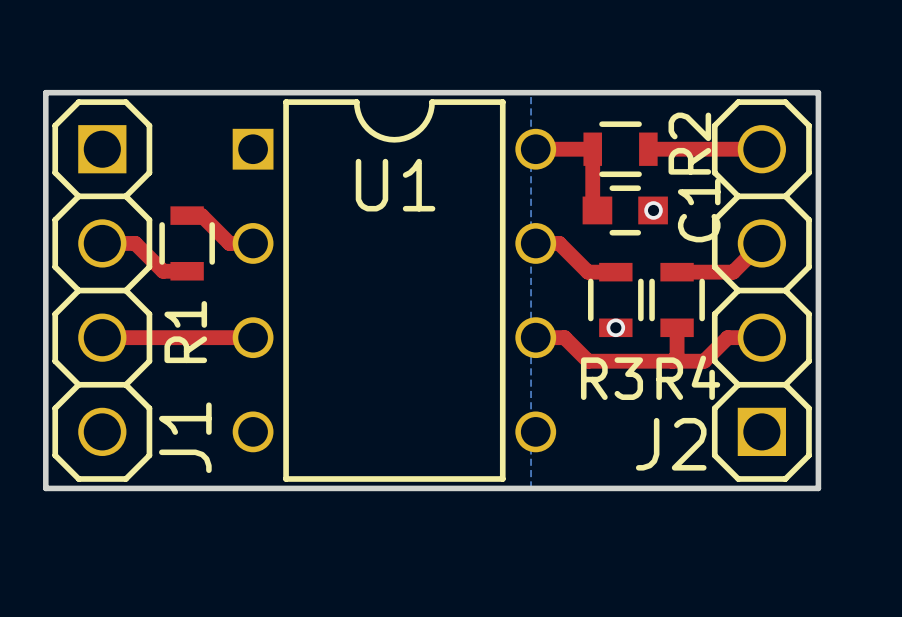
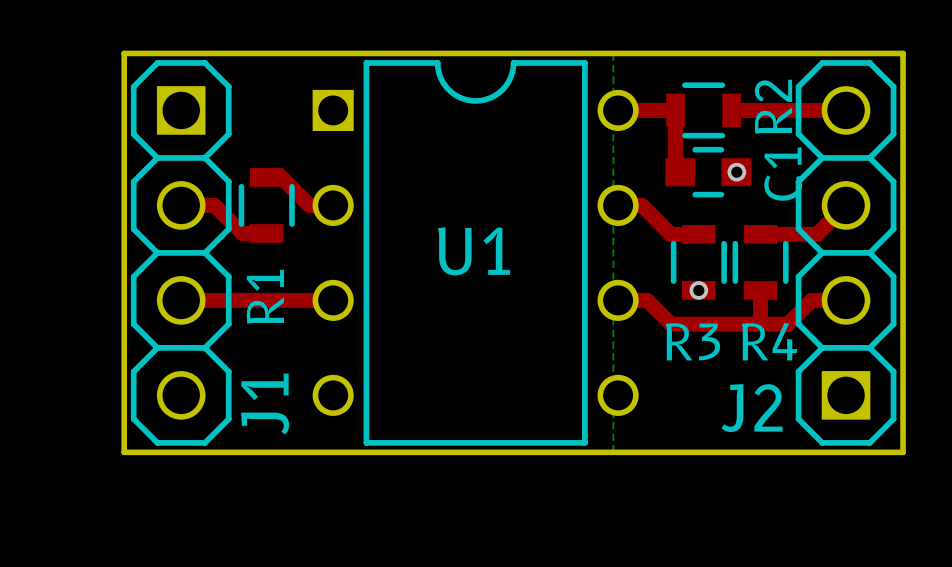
U1 name position: U1 (395, 185) -> U1 (474, 251)

